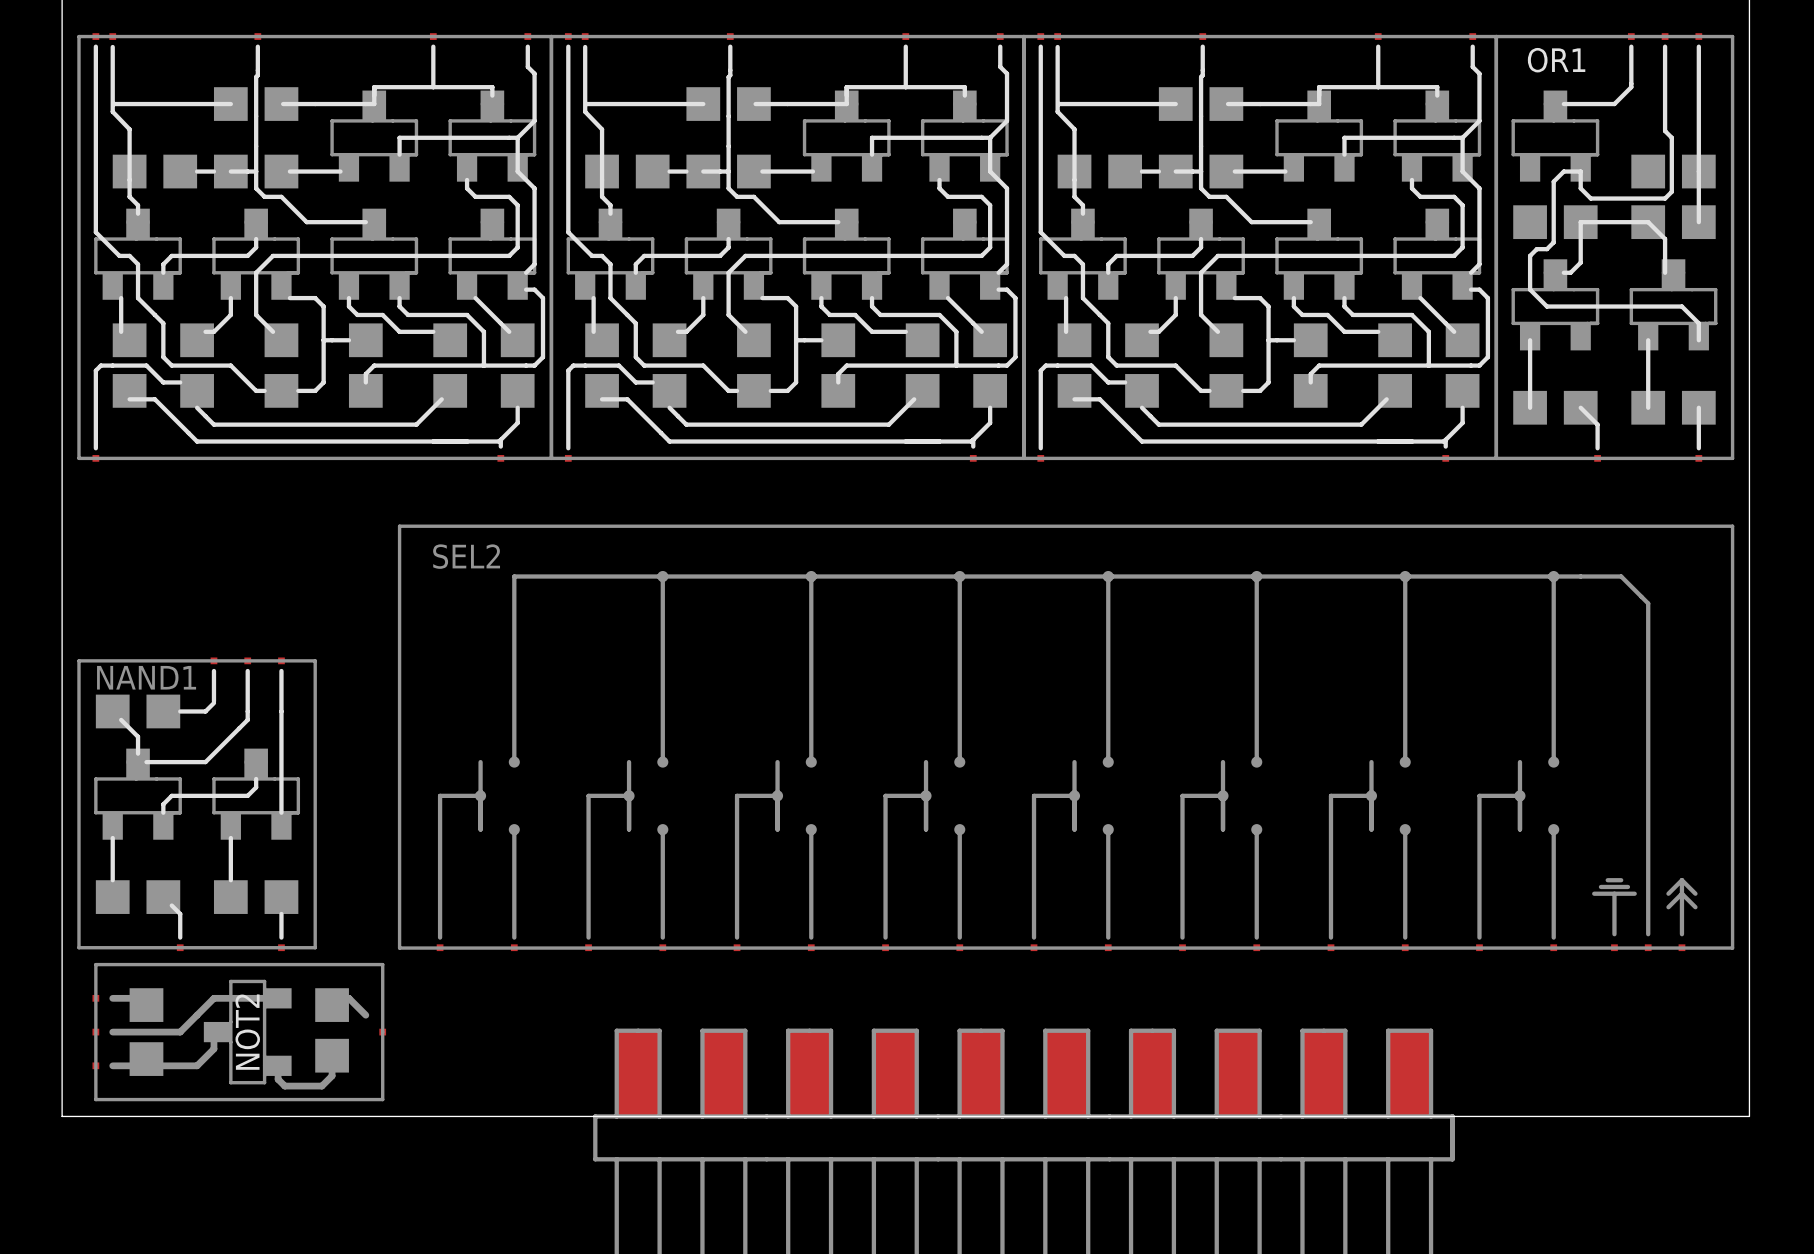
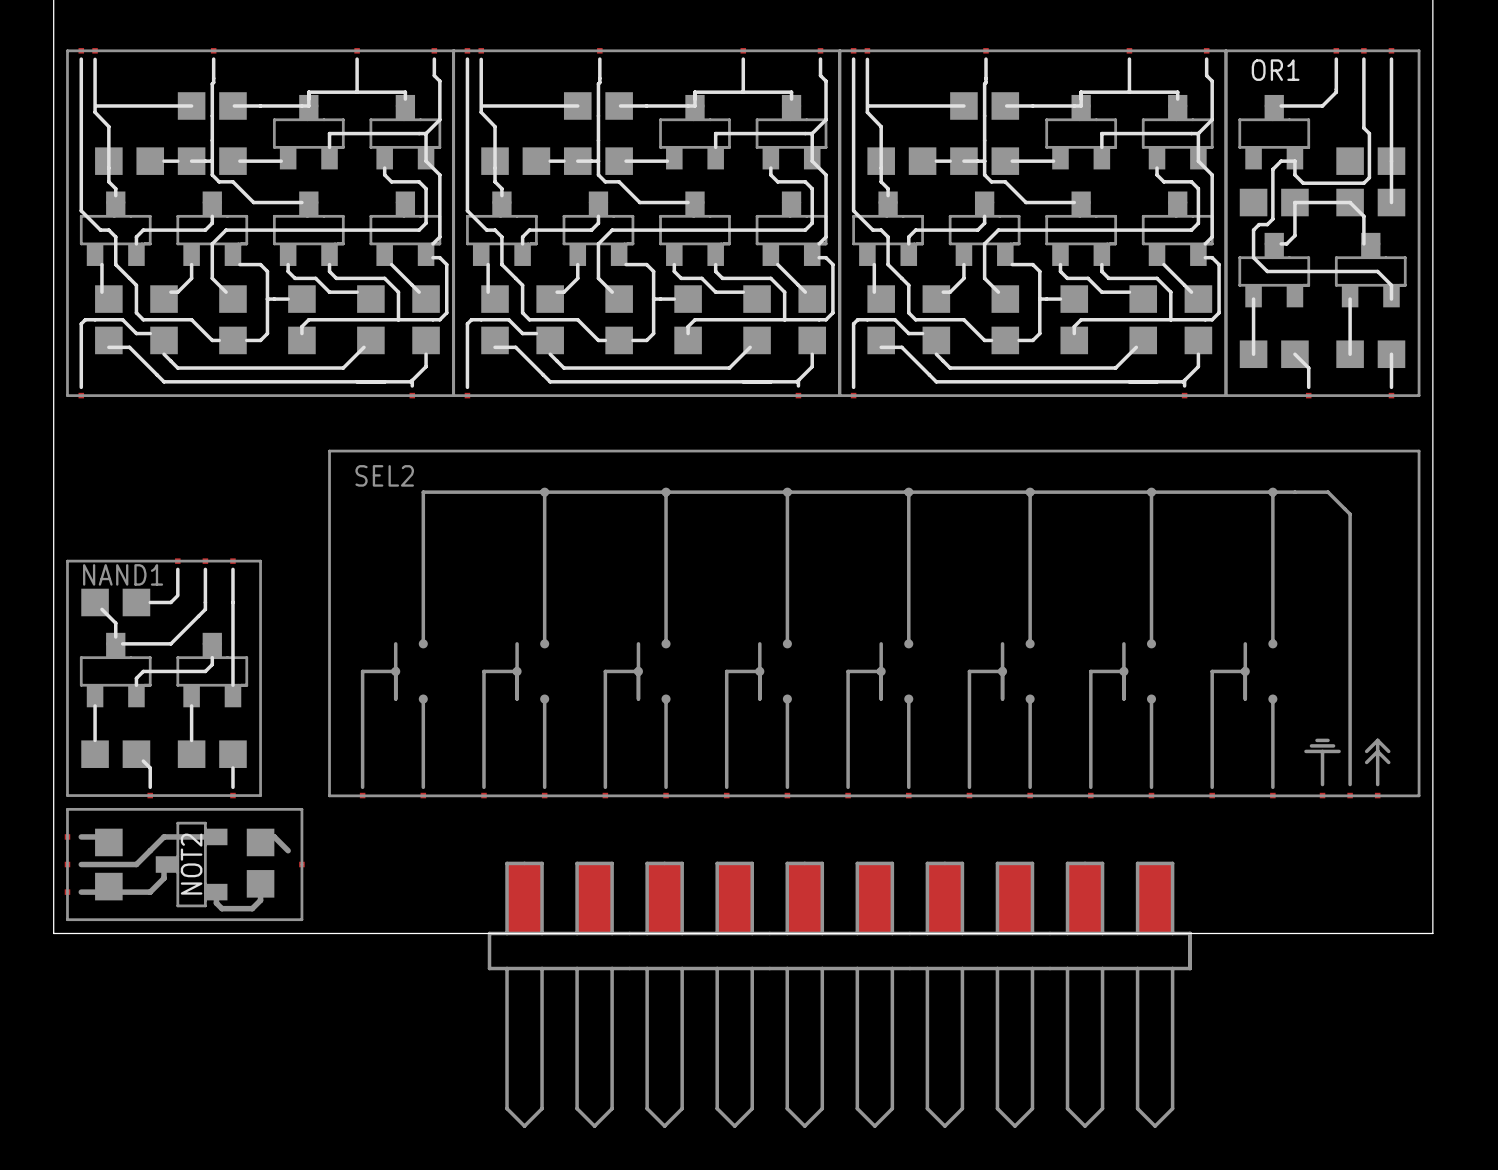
NOT2 position: (239, 1032) -> (184, 864)

